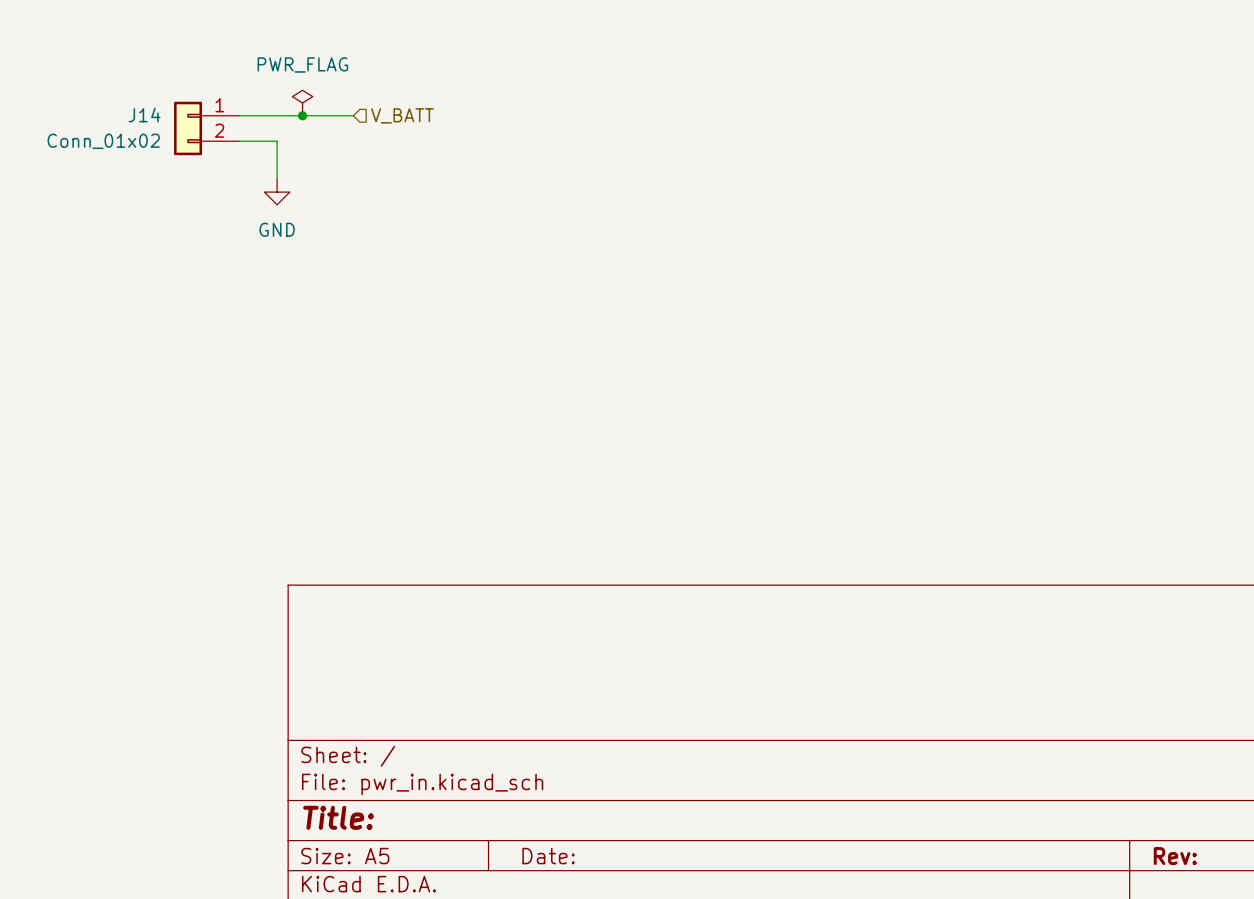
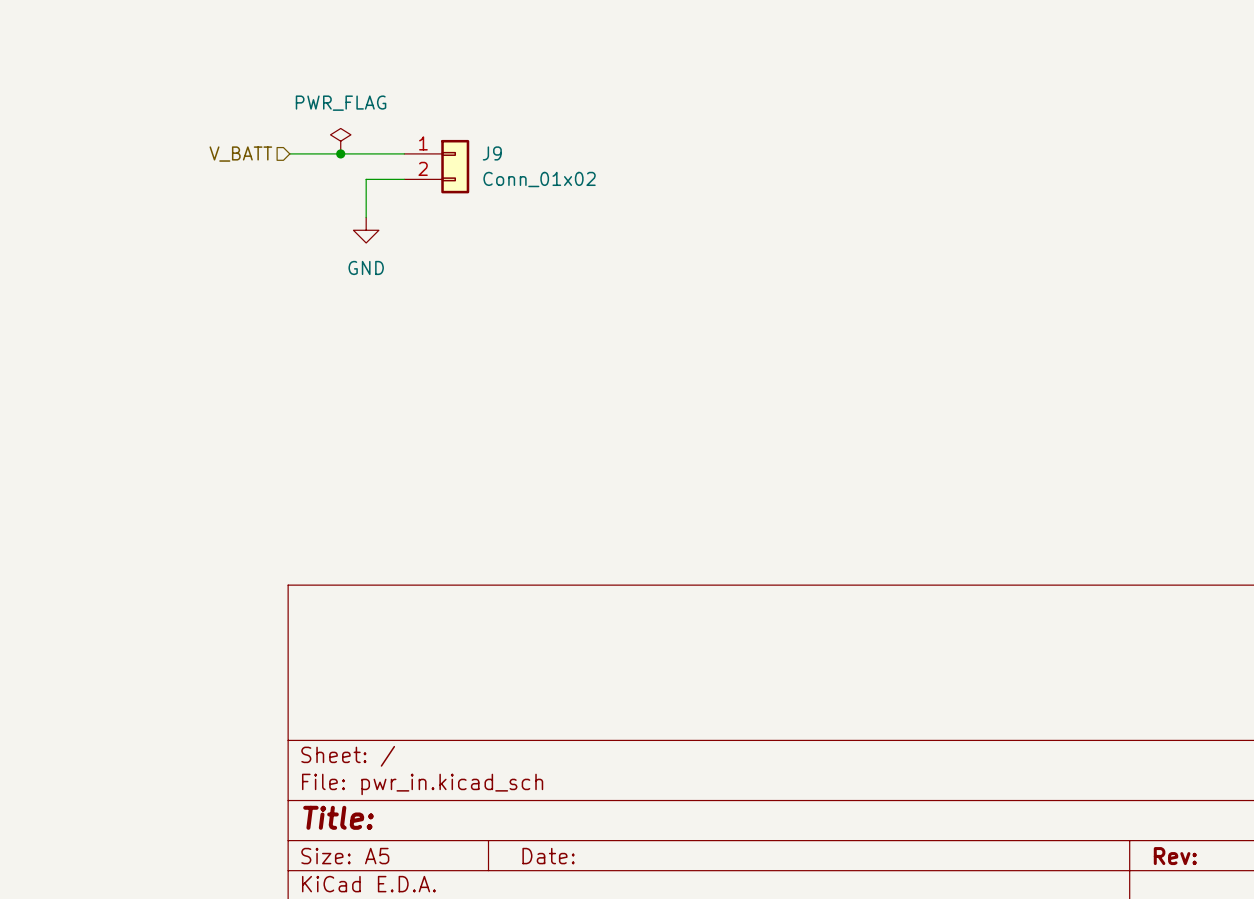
power symbol position: PWR_FLAG (302, 103) -> PWR_FLAG (340, 141)
wire: (238, 115) (353, 115) -> (289, 153) (404, 153)
junction position: (302, 115) -> (340, 153)
hierarchical label rotation: 0° (402, 115) -> 180° (240, 154)
hierarchical label position: V_BATT (402, 115) -> V_BATT (240, 154)
J14: Conn_01x02 (206, 128) -> none
wire: (238, 141) (277, 141) (277, 179) -> none
J9: none -> Conn_01x02 (436, 166)
wire: none -> (404, 179) (366, 179) (366, 217)
power symbol position: GND (277, 192) -> GND (366, 230)

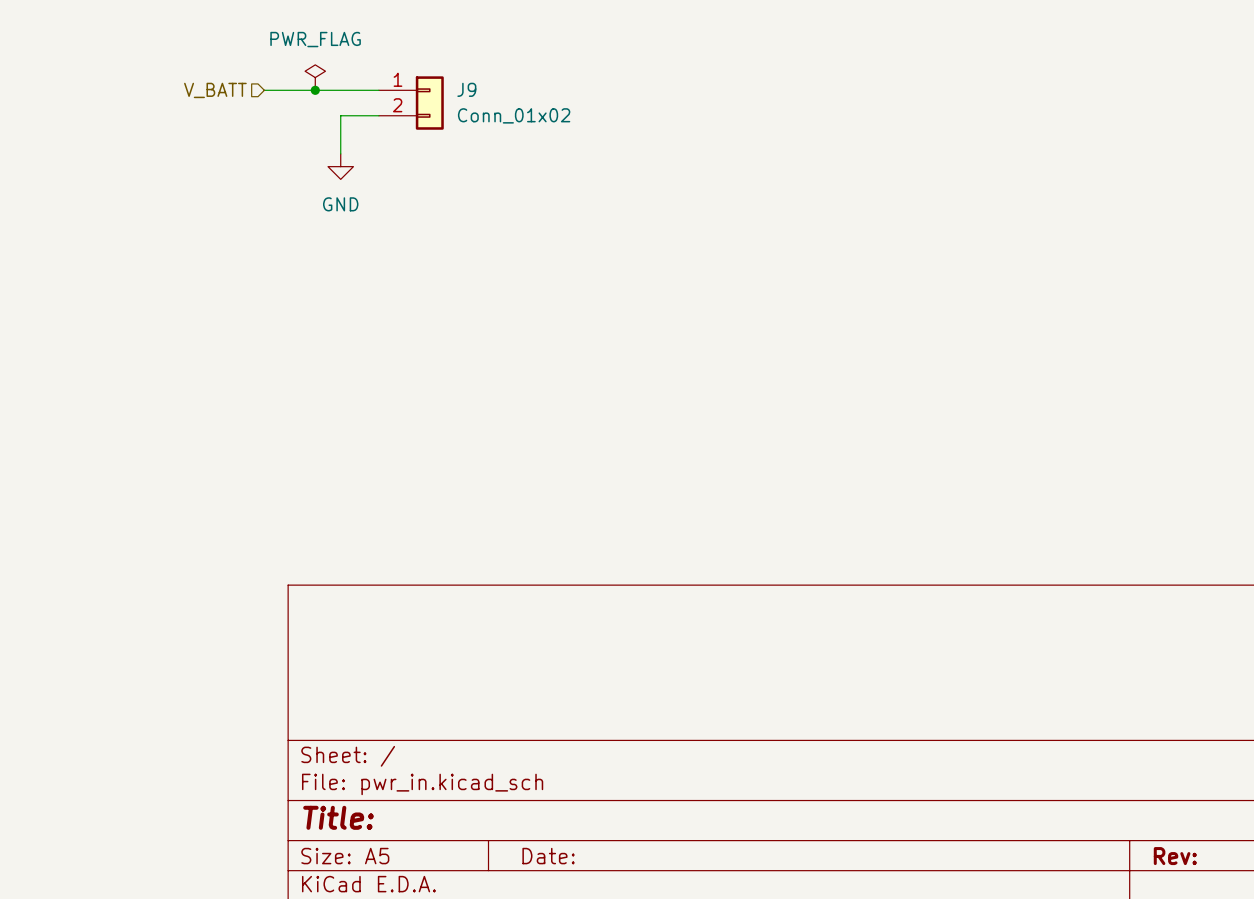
junction: none -> (315, 90)
power symbol position: PWR_FLAG (340, 141) -> PWR_FLAG (315, 77)
wire: (289, 153) (404, 153) -> (264, 90) (378, 90)
junction: (340, 153) -> none
hierarchical label position: V_BATT (240, 154) -> V_BATT (215, 90)
J9 position: (436, 166) -> (411, 103)
wire: (404, 179) (366, 179) (366, 217) -> (378, 115) (340, 115) (340, 153)
power symbol position: GND (366, 230) -> GND (340, 166)

